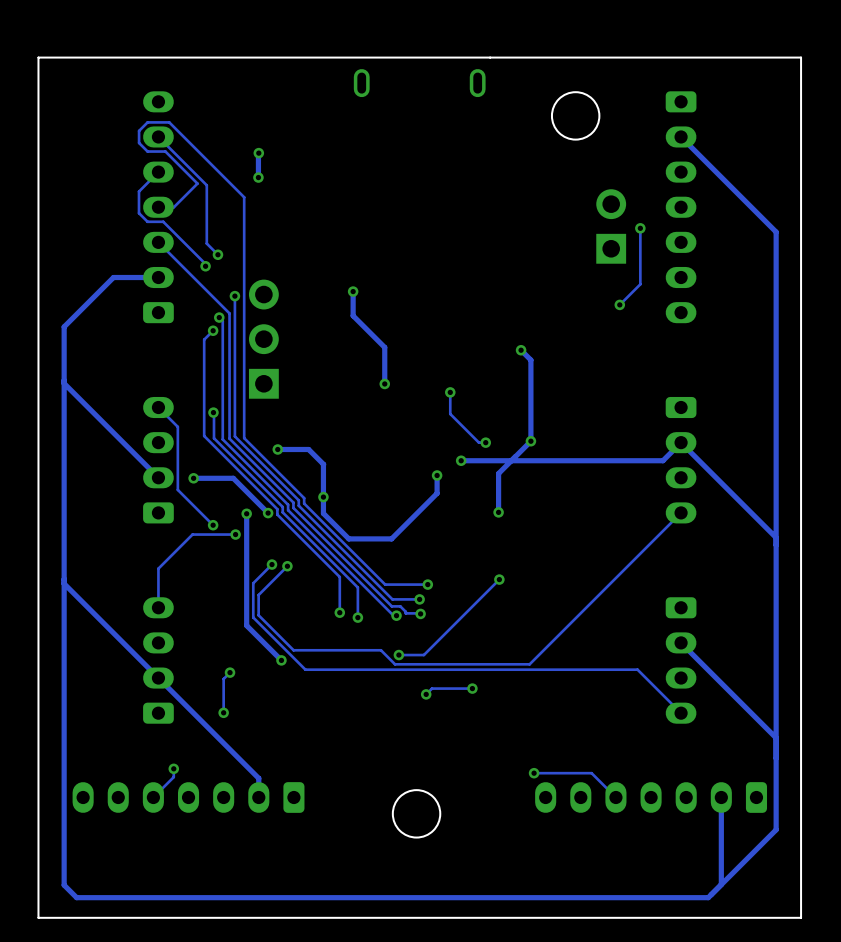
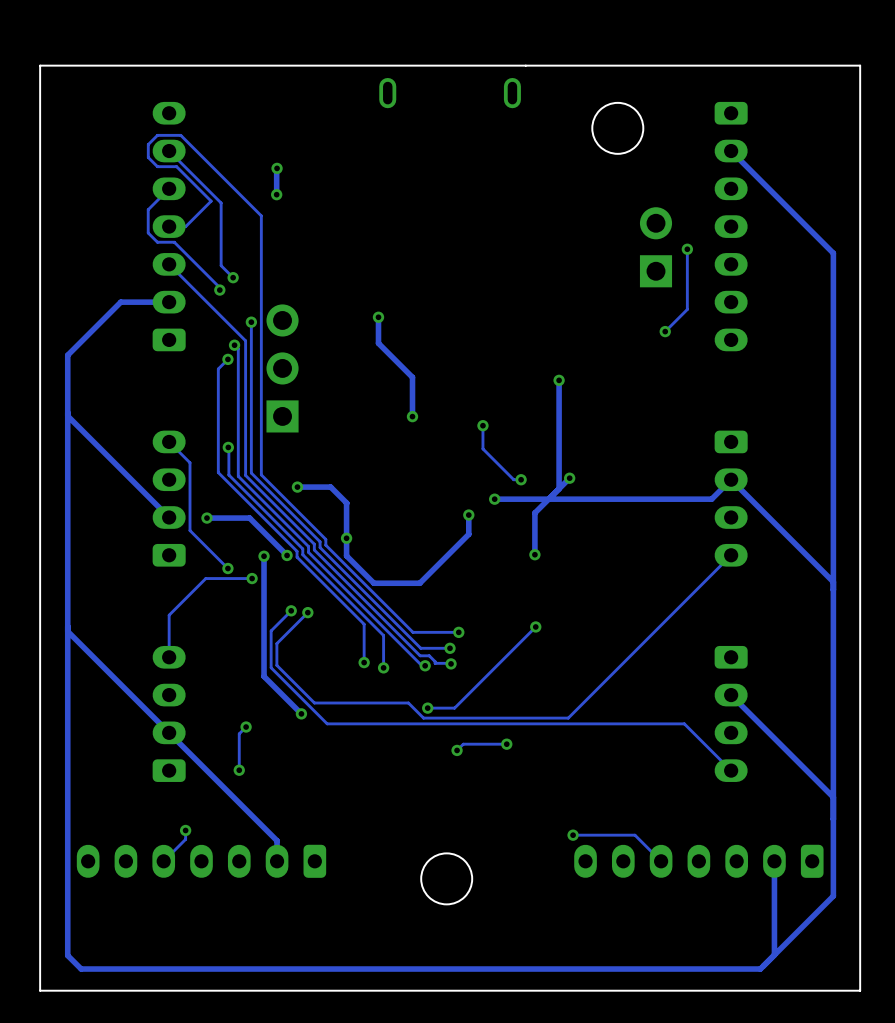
track: (521, 350) (530, 360) (530, 441) -> (559, 380) (559, 488)

